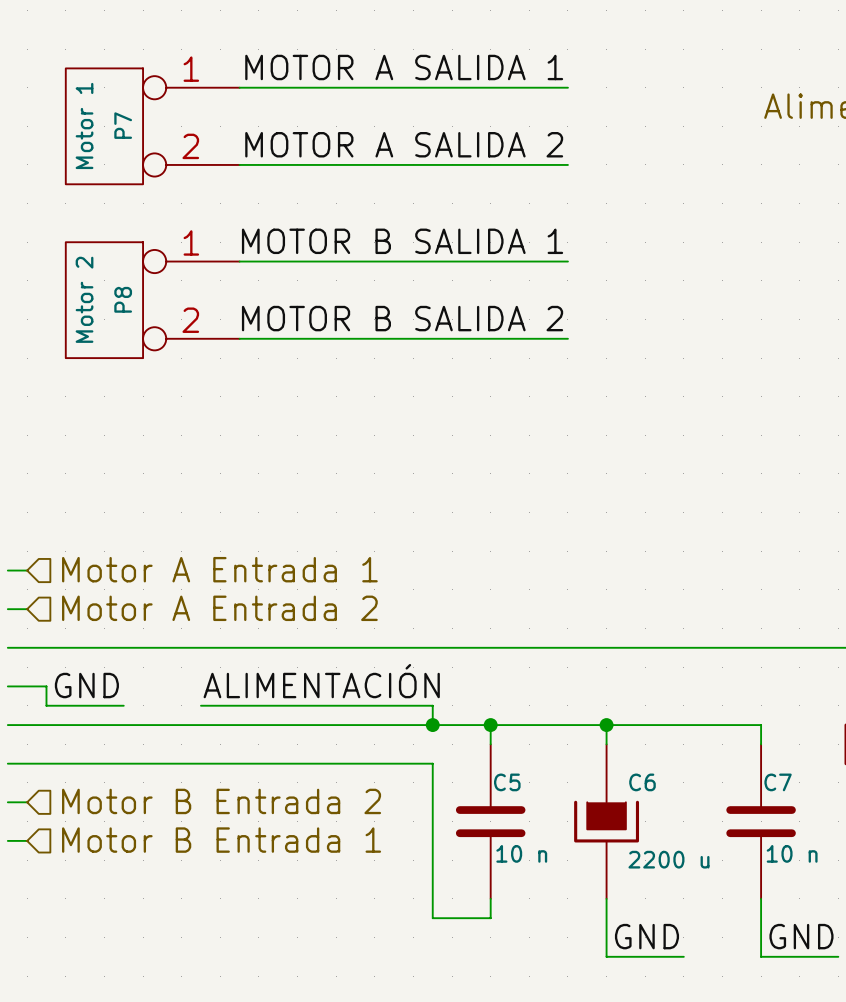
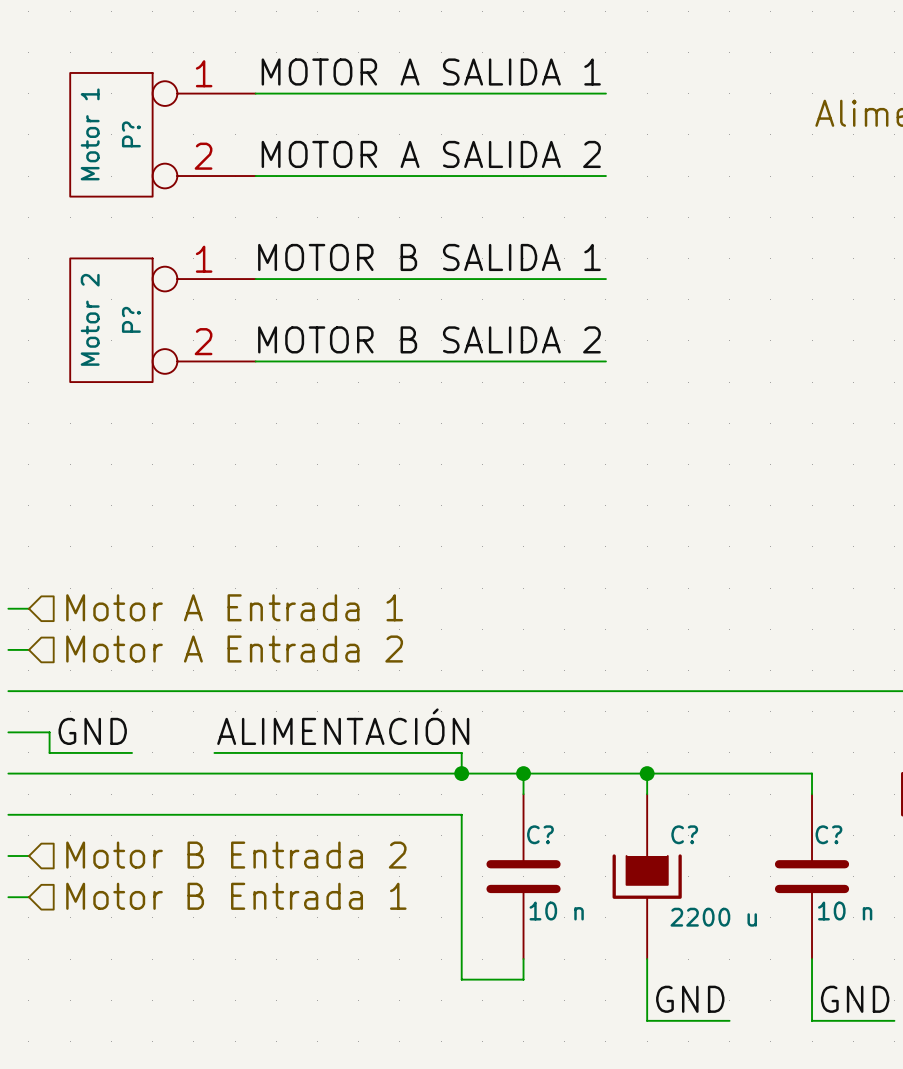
P7 name: P7 (123, 125) -> P? (131, 134)
P8 name: P8 (123, 299) -> P? (131, 319)
C5 name: C5 (507, 782) -> C? (540, 834)
C6 name: C6 (642, 782) -> C? (684, 834)
C7 name: C7 (778, 782) -> C? (828, 834)

